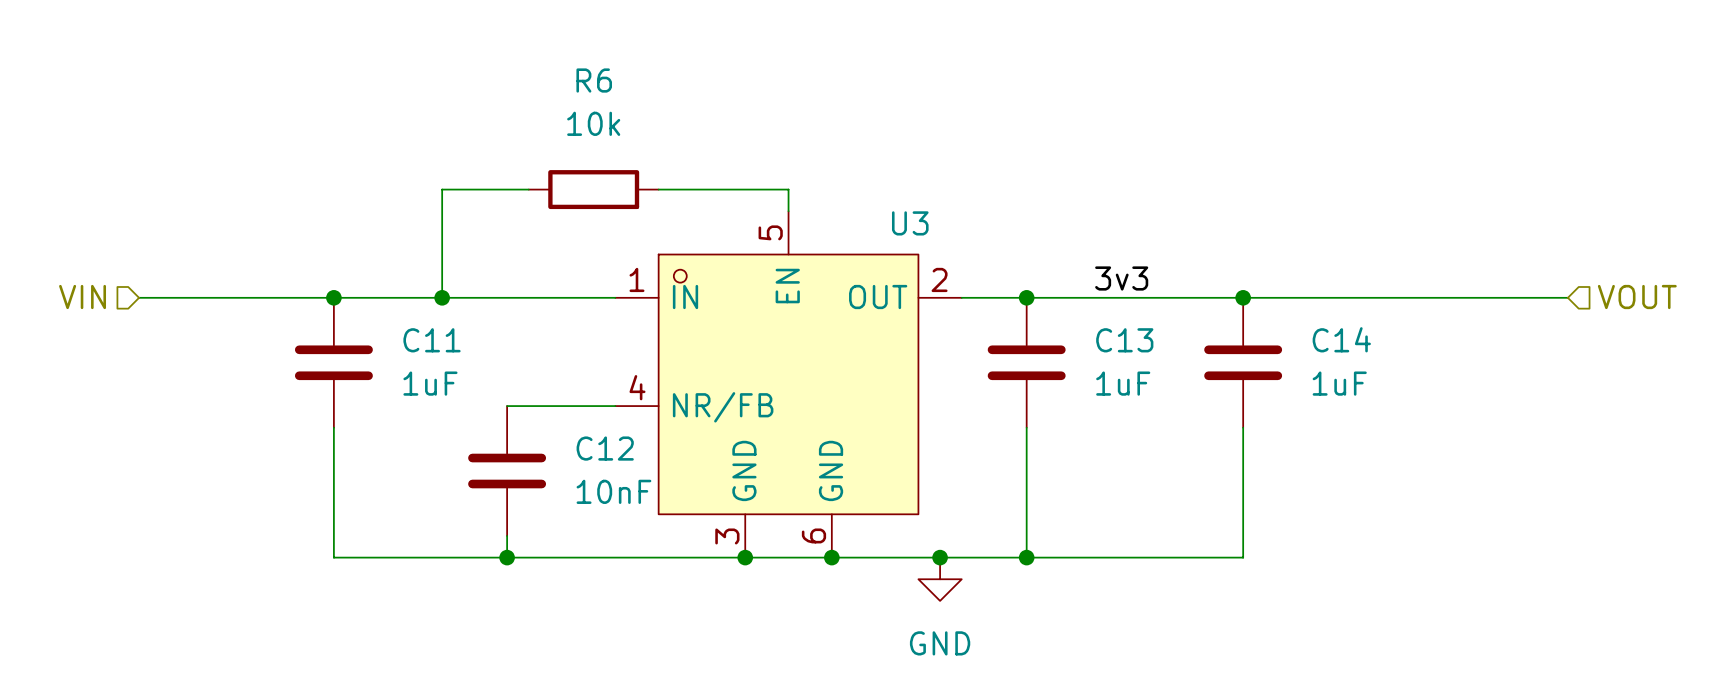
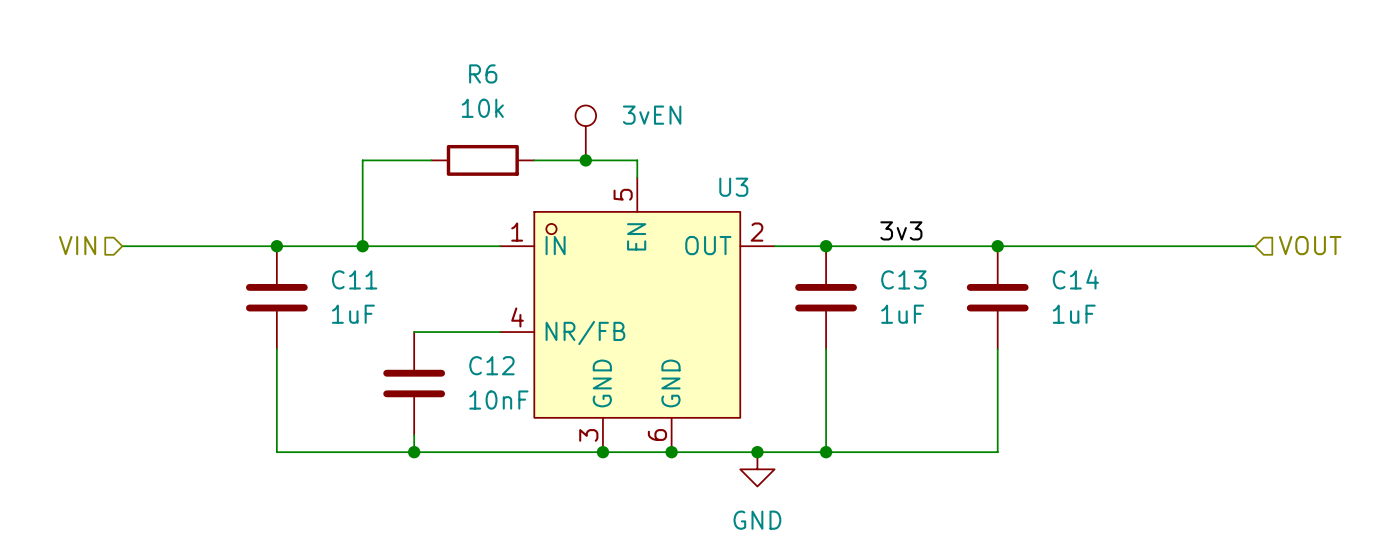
part: none -> (585, 132)
junction: none -> (585, 160)

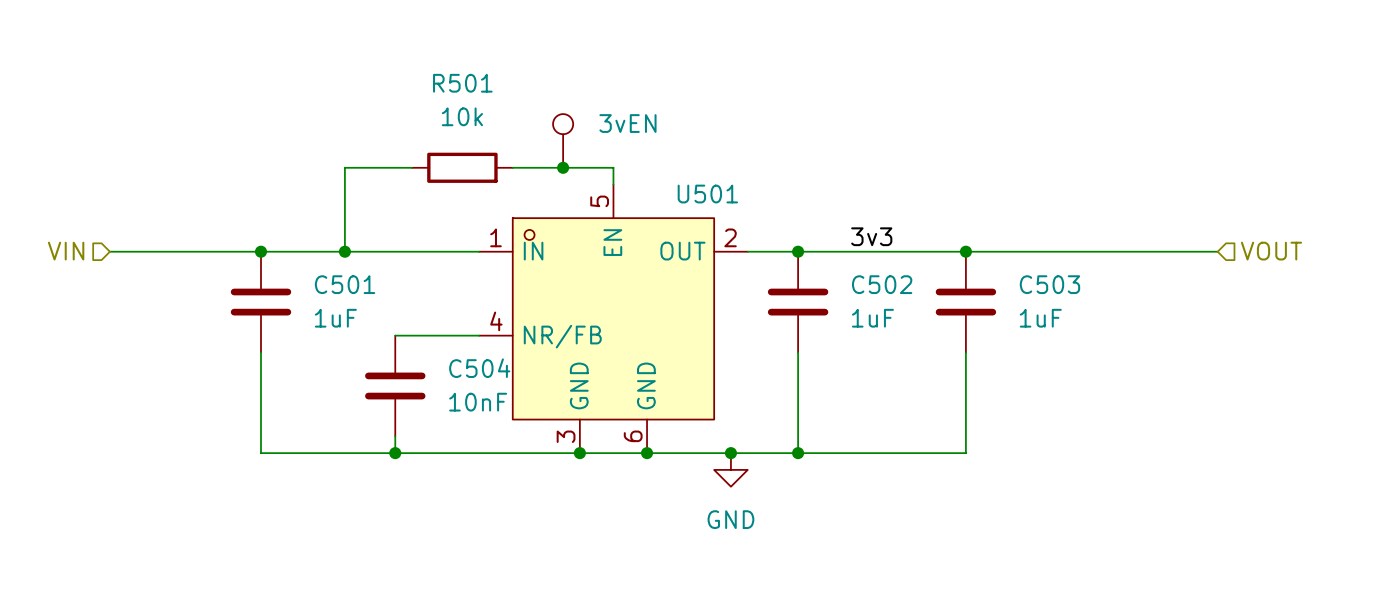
R6 name: R6 (483, 73) -> R501 (462, 83)
U3 name: U3 (733, 187) -> U501 (707, 194)
C11 name: C11 (354, 279) -> C501 (345, 284)
C13 name: C13 (903, 279) -> C502 (882, 284)
C14 name: C14 (1075, 279) -> C503 (1049, 284)
C12 name: C12 (491, 365) -> C504 (479, 368)

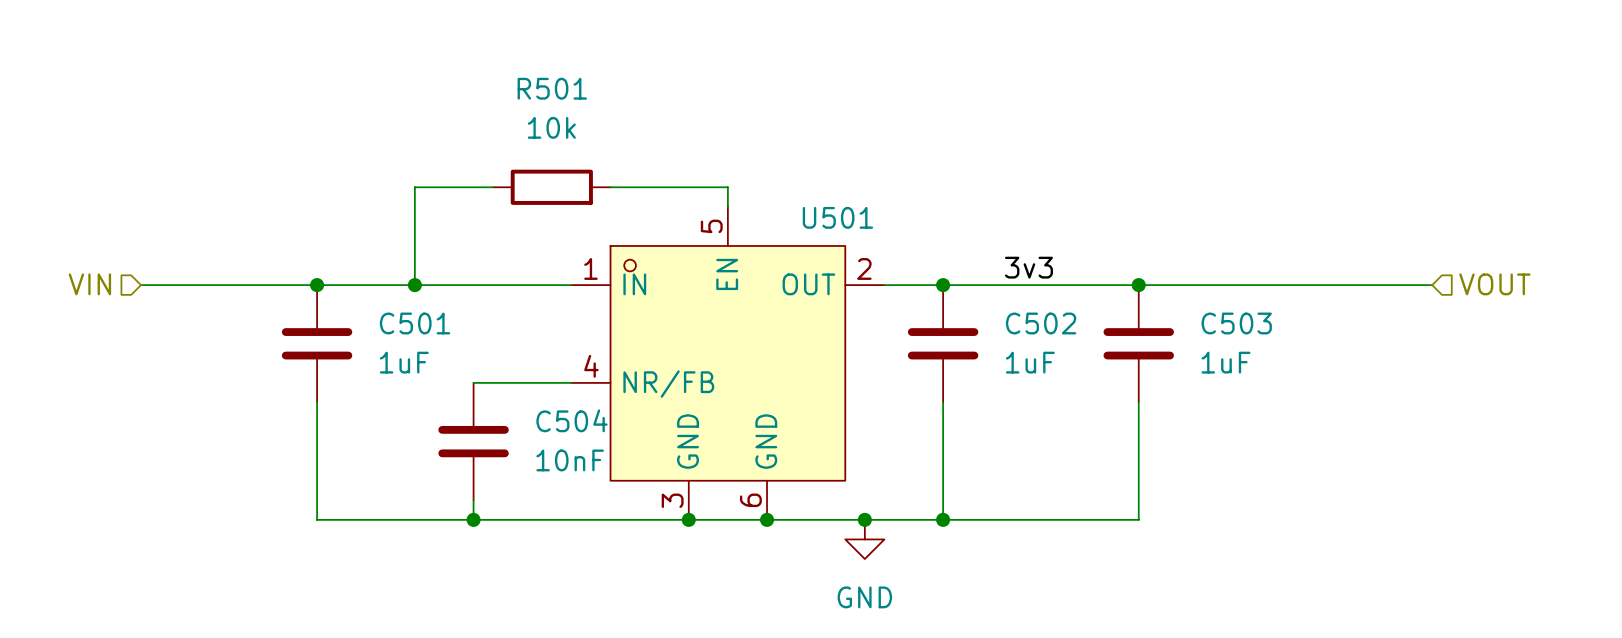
part: (563, 140) -> none
junction: (563, 167) -> none

